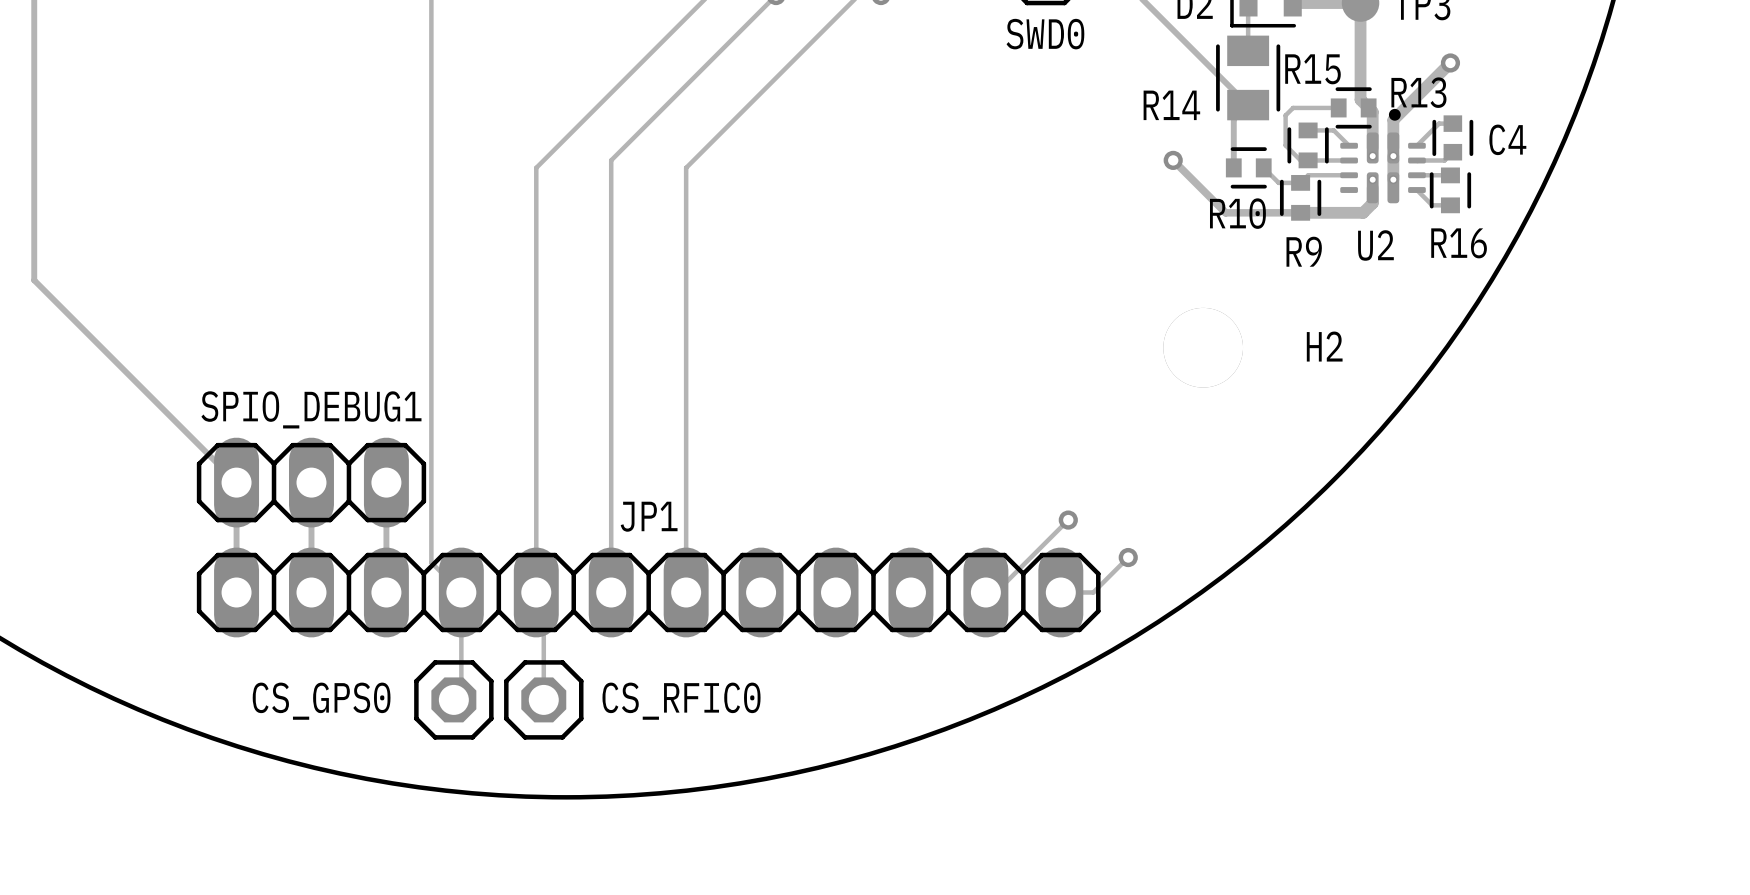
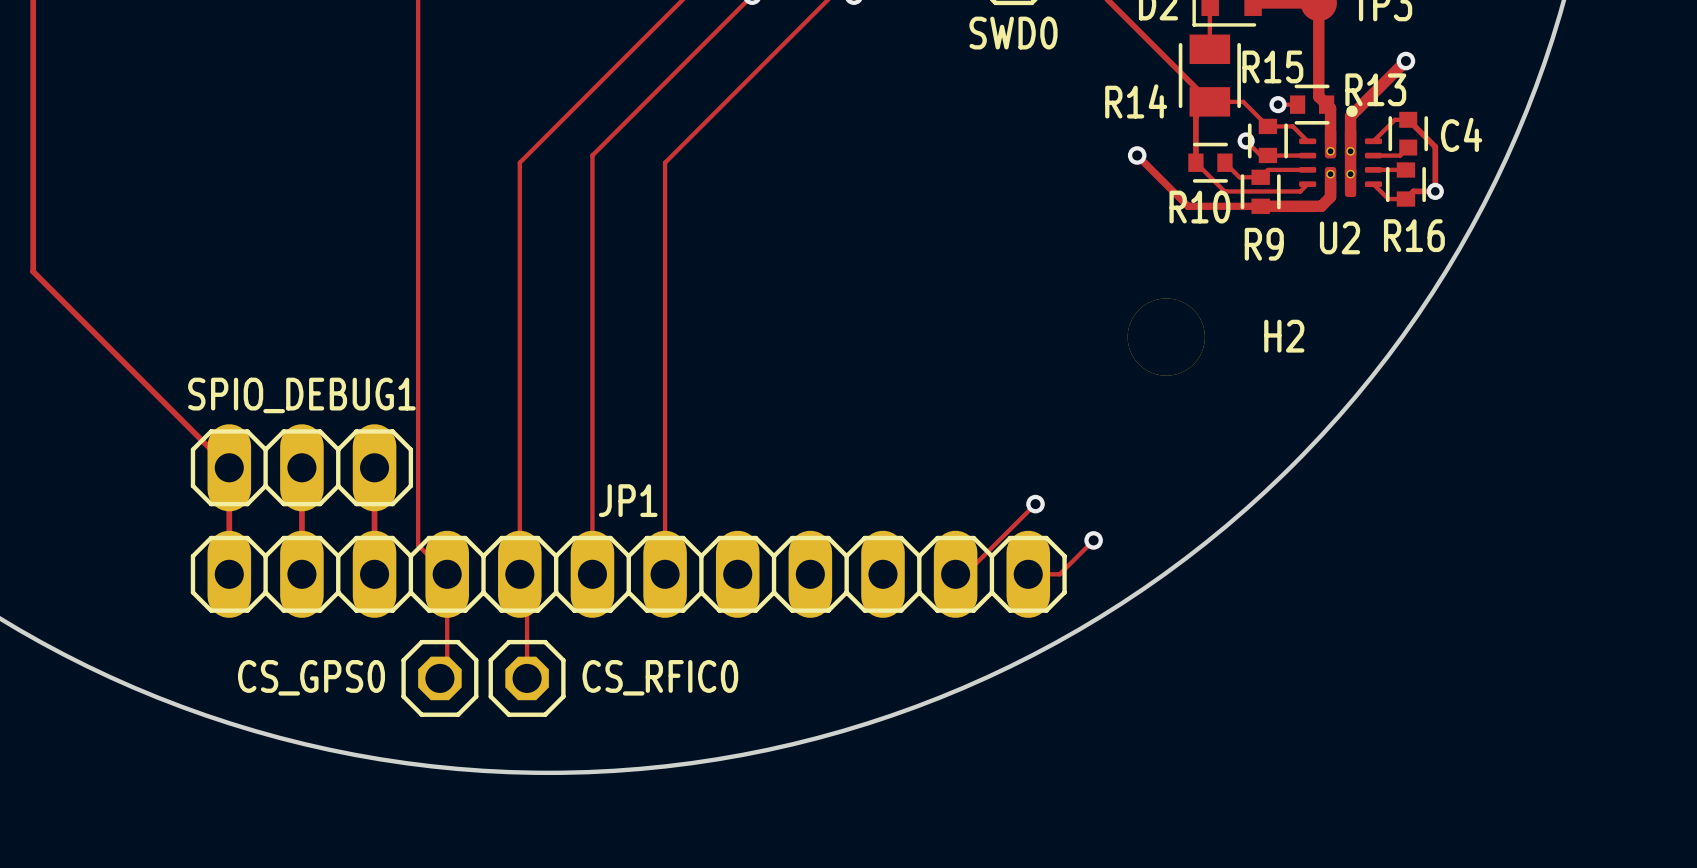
track: none -> (1209, 101) (1243, 101) (1267, 126)
track: (1318, 107) (1293, 107) (1285, 115) (1285, 145) -> none
via: none -> (1278, 104)
track: none -> (1408, 119) (1435, 146) (1435, 191) (1413, 191) (1405, 199)
via: none -> (1246, 140)
track: none -> (1195, 162) (1224, 191) (1300, 191) (1307, 184)
via: none -> (1435, 191)

